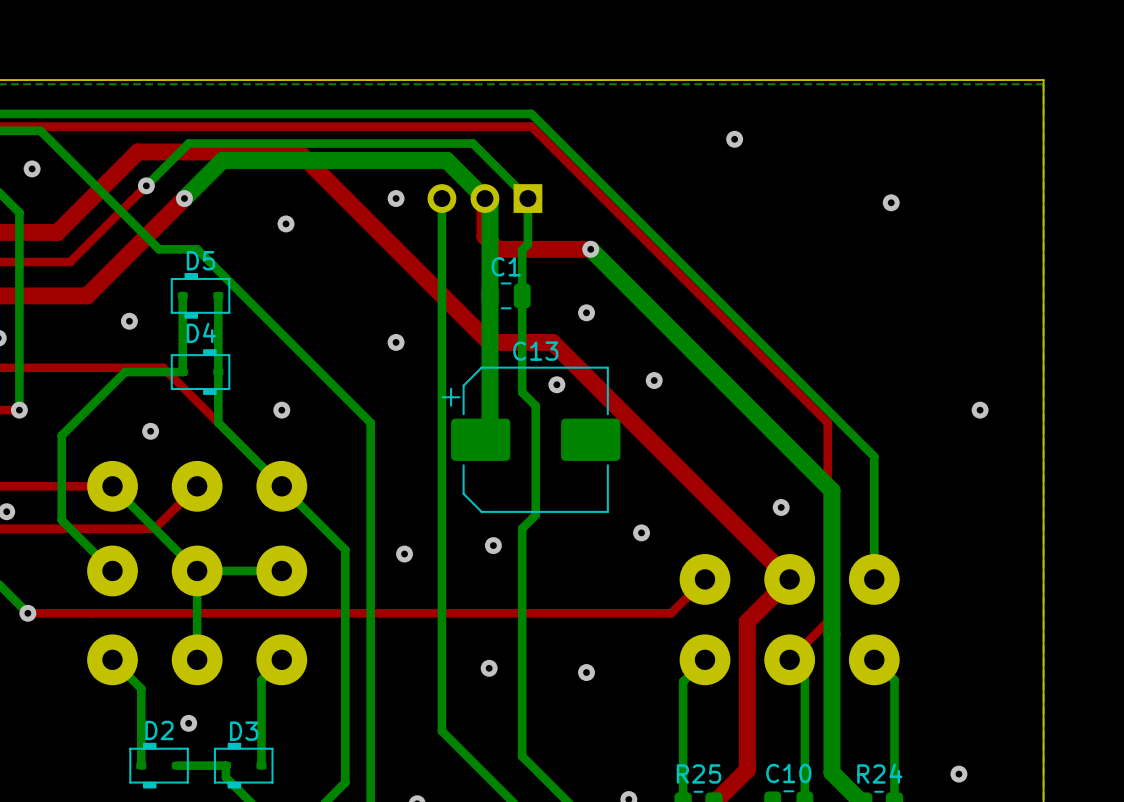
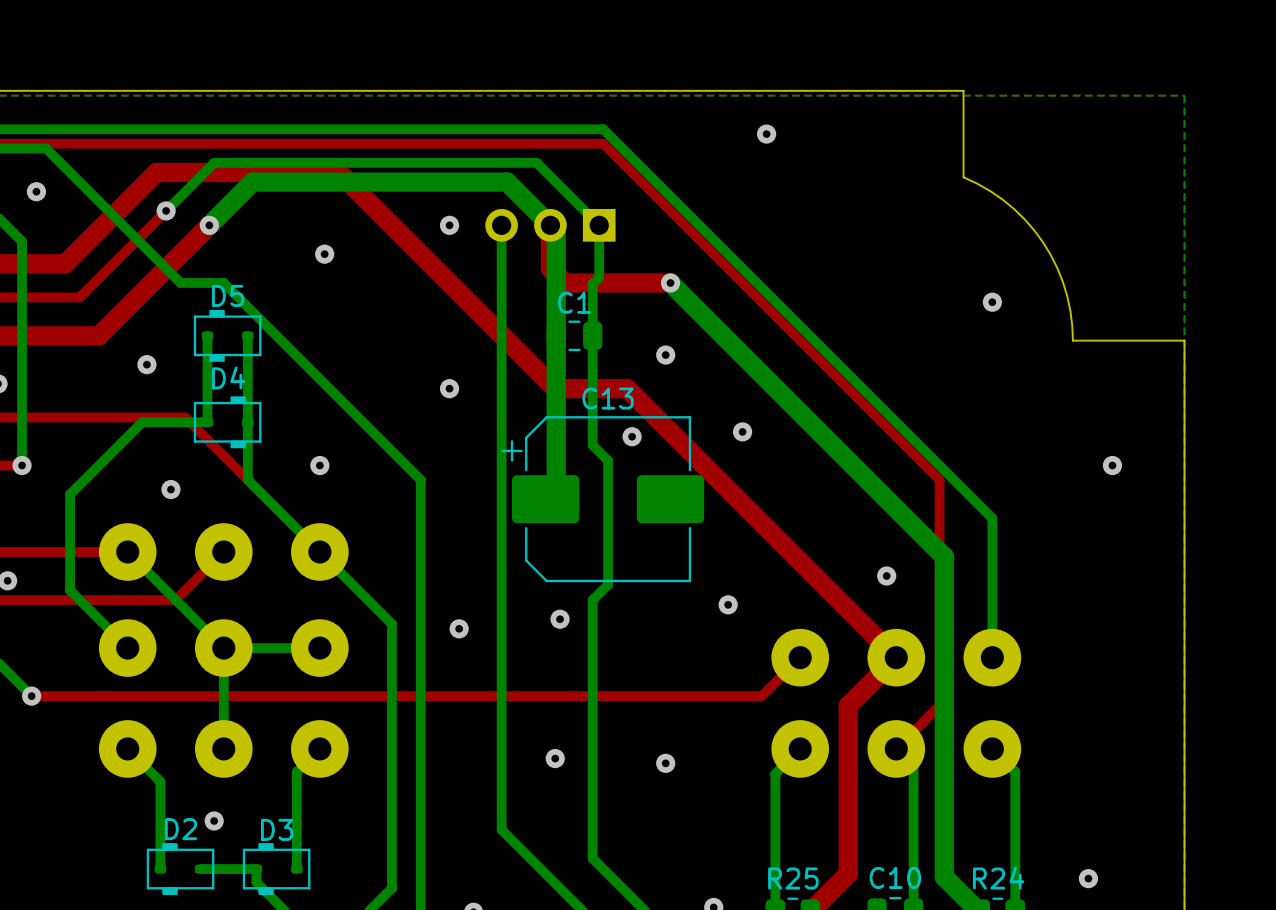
board edge: (848, 80) (1043, 80) (1043, 300) -> (963, 90) (963, 177) (989, 190) (1013, 208) (1043, 242) (1062, 282) (1070, 310) (1072, 340) (1184, 340)
via position: (734, 139) -> (766, 134)
via position: (891, 202) -> (992, 302)

